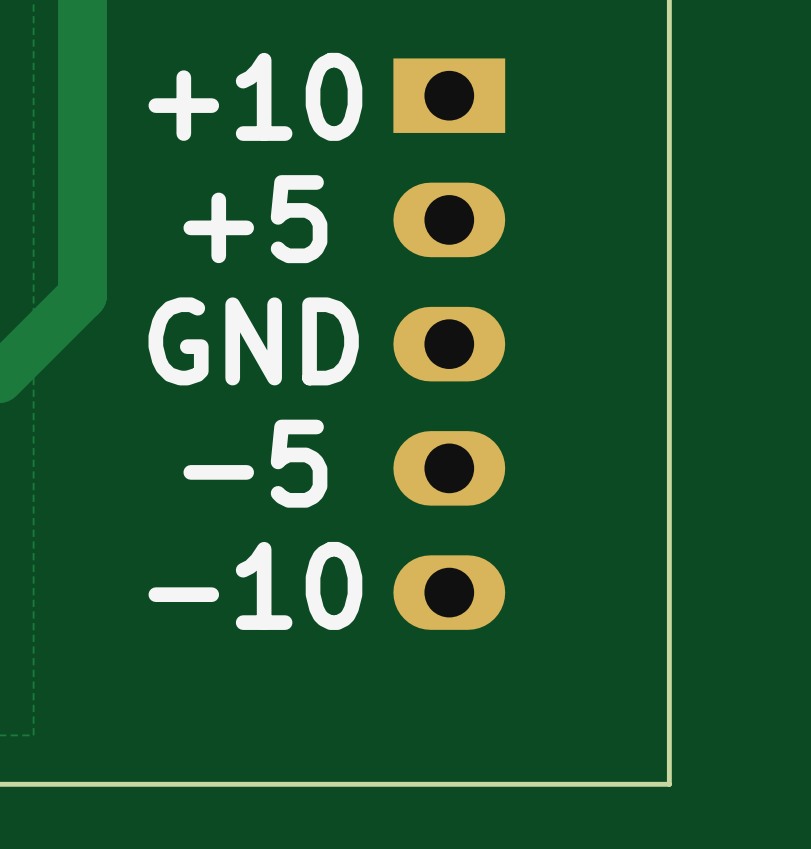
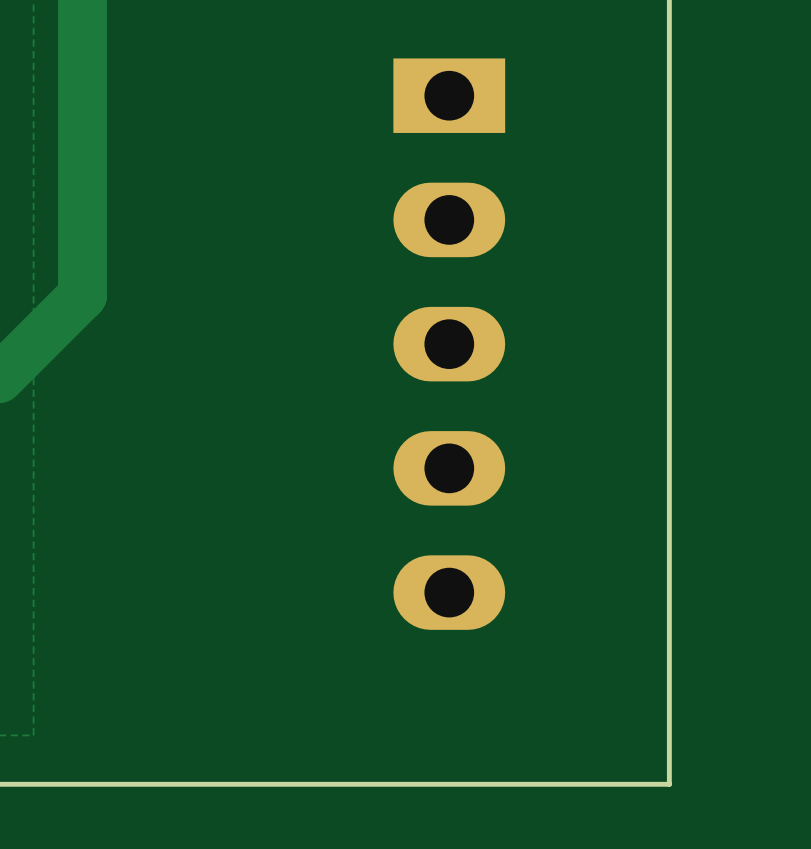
text: +10 (255, 96) -> none
text: +5 (255, 219) -> none
text: GND (253, 341) -> none
text: -5 (255, 463) -> none
text: -10 (255, 585) -> none

